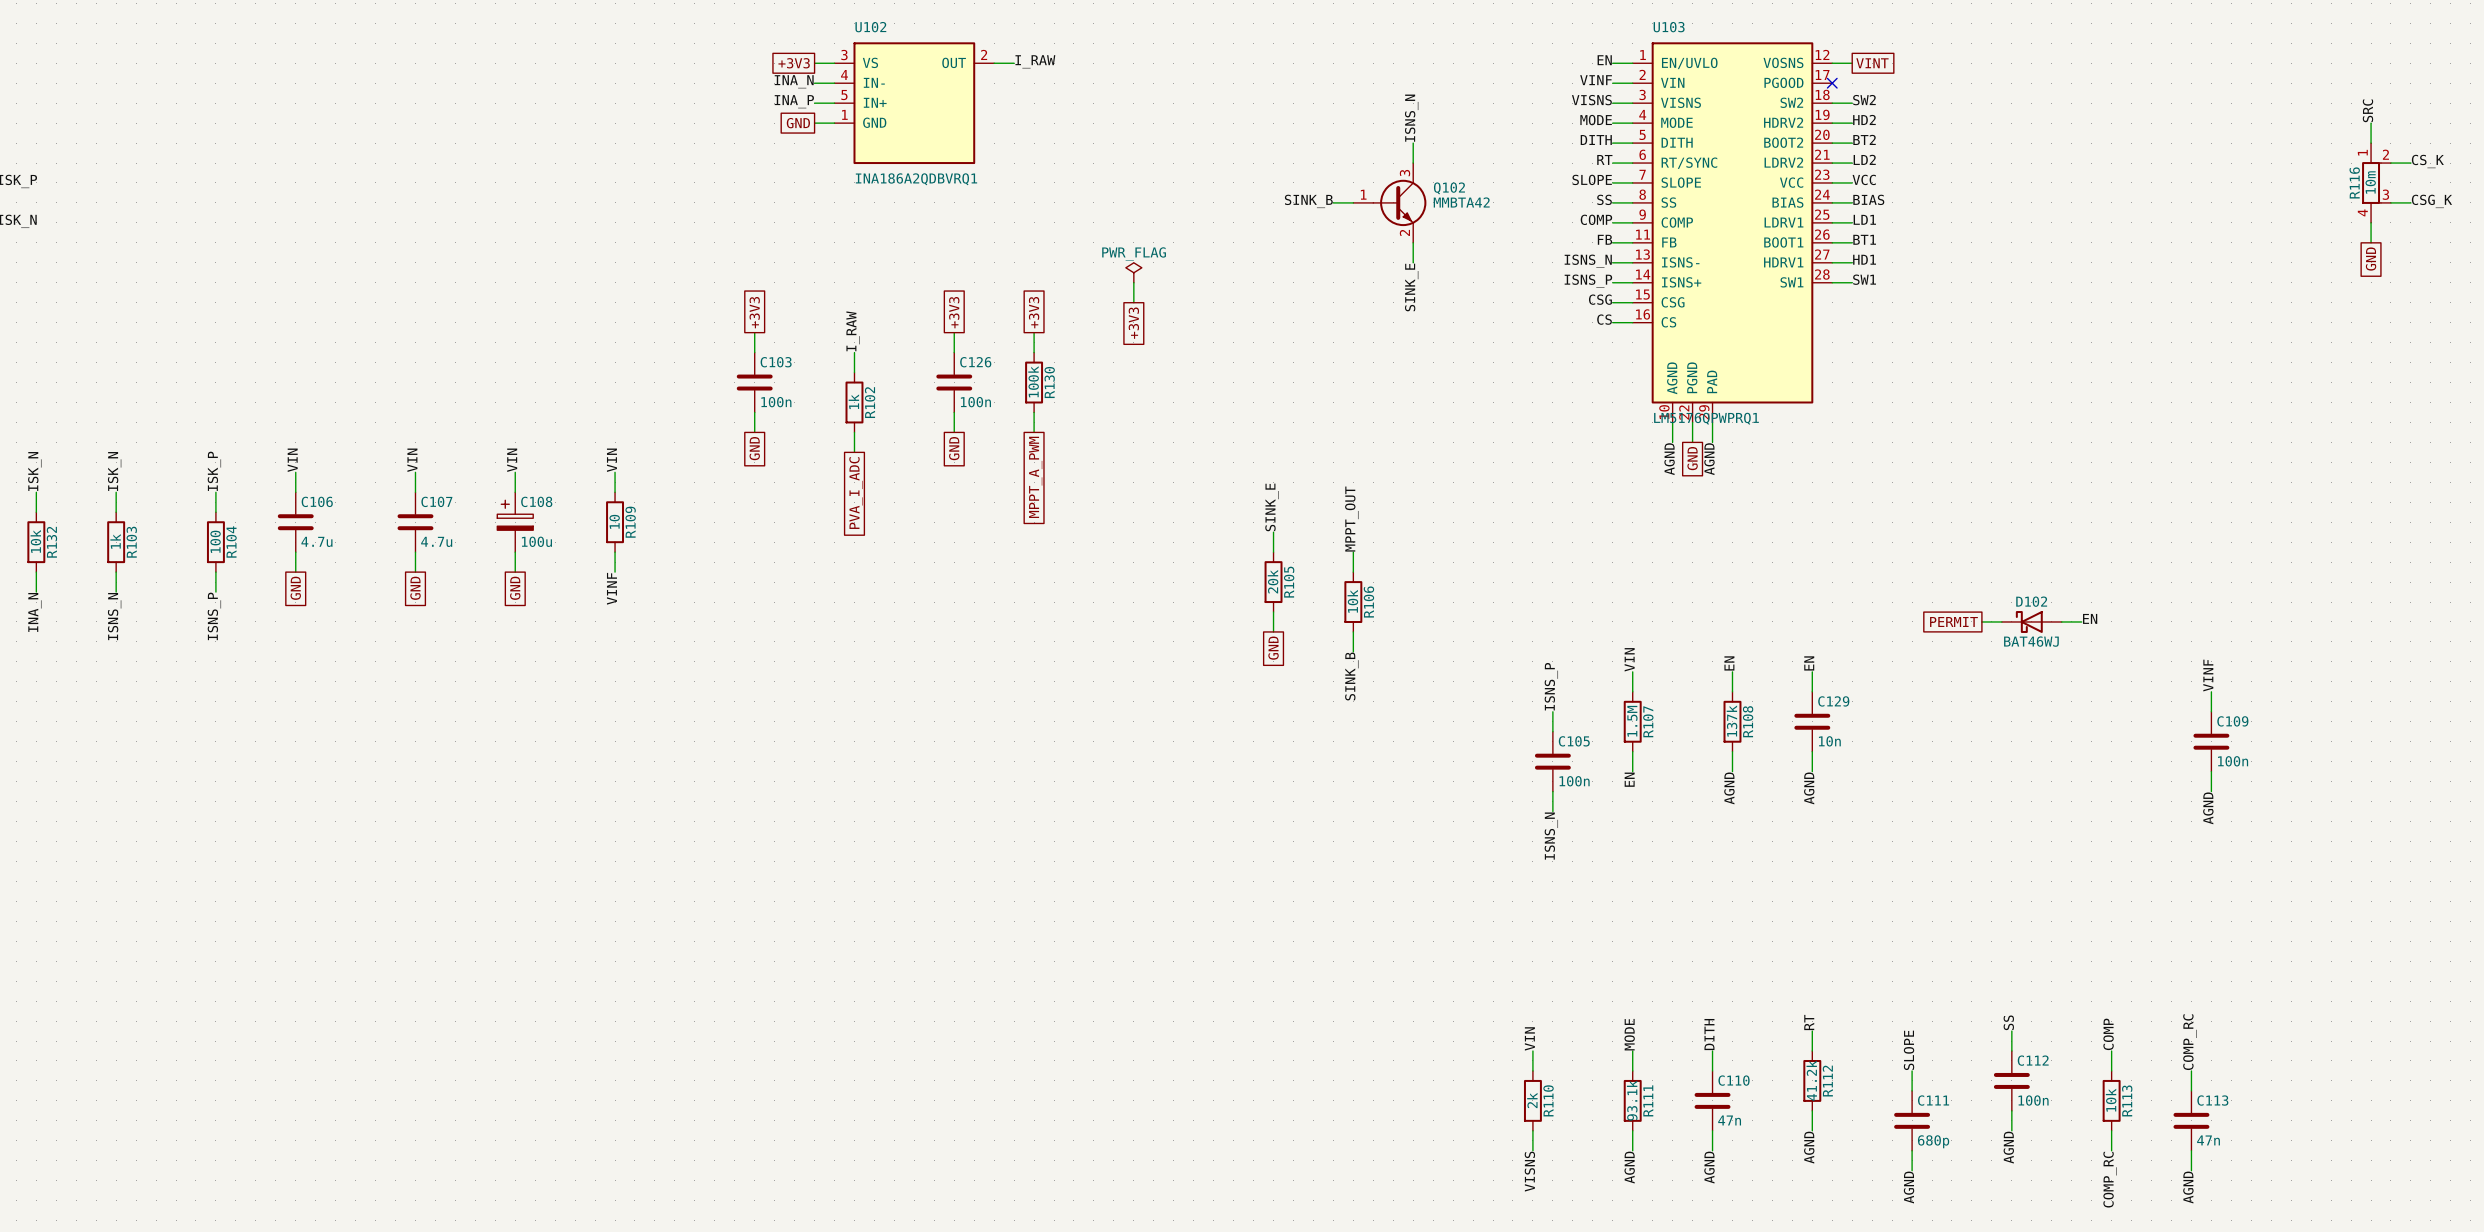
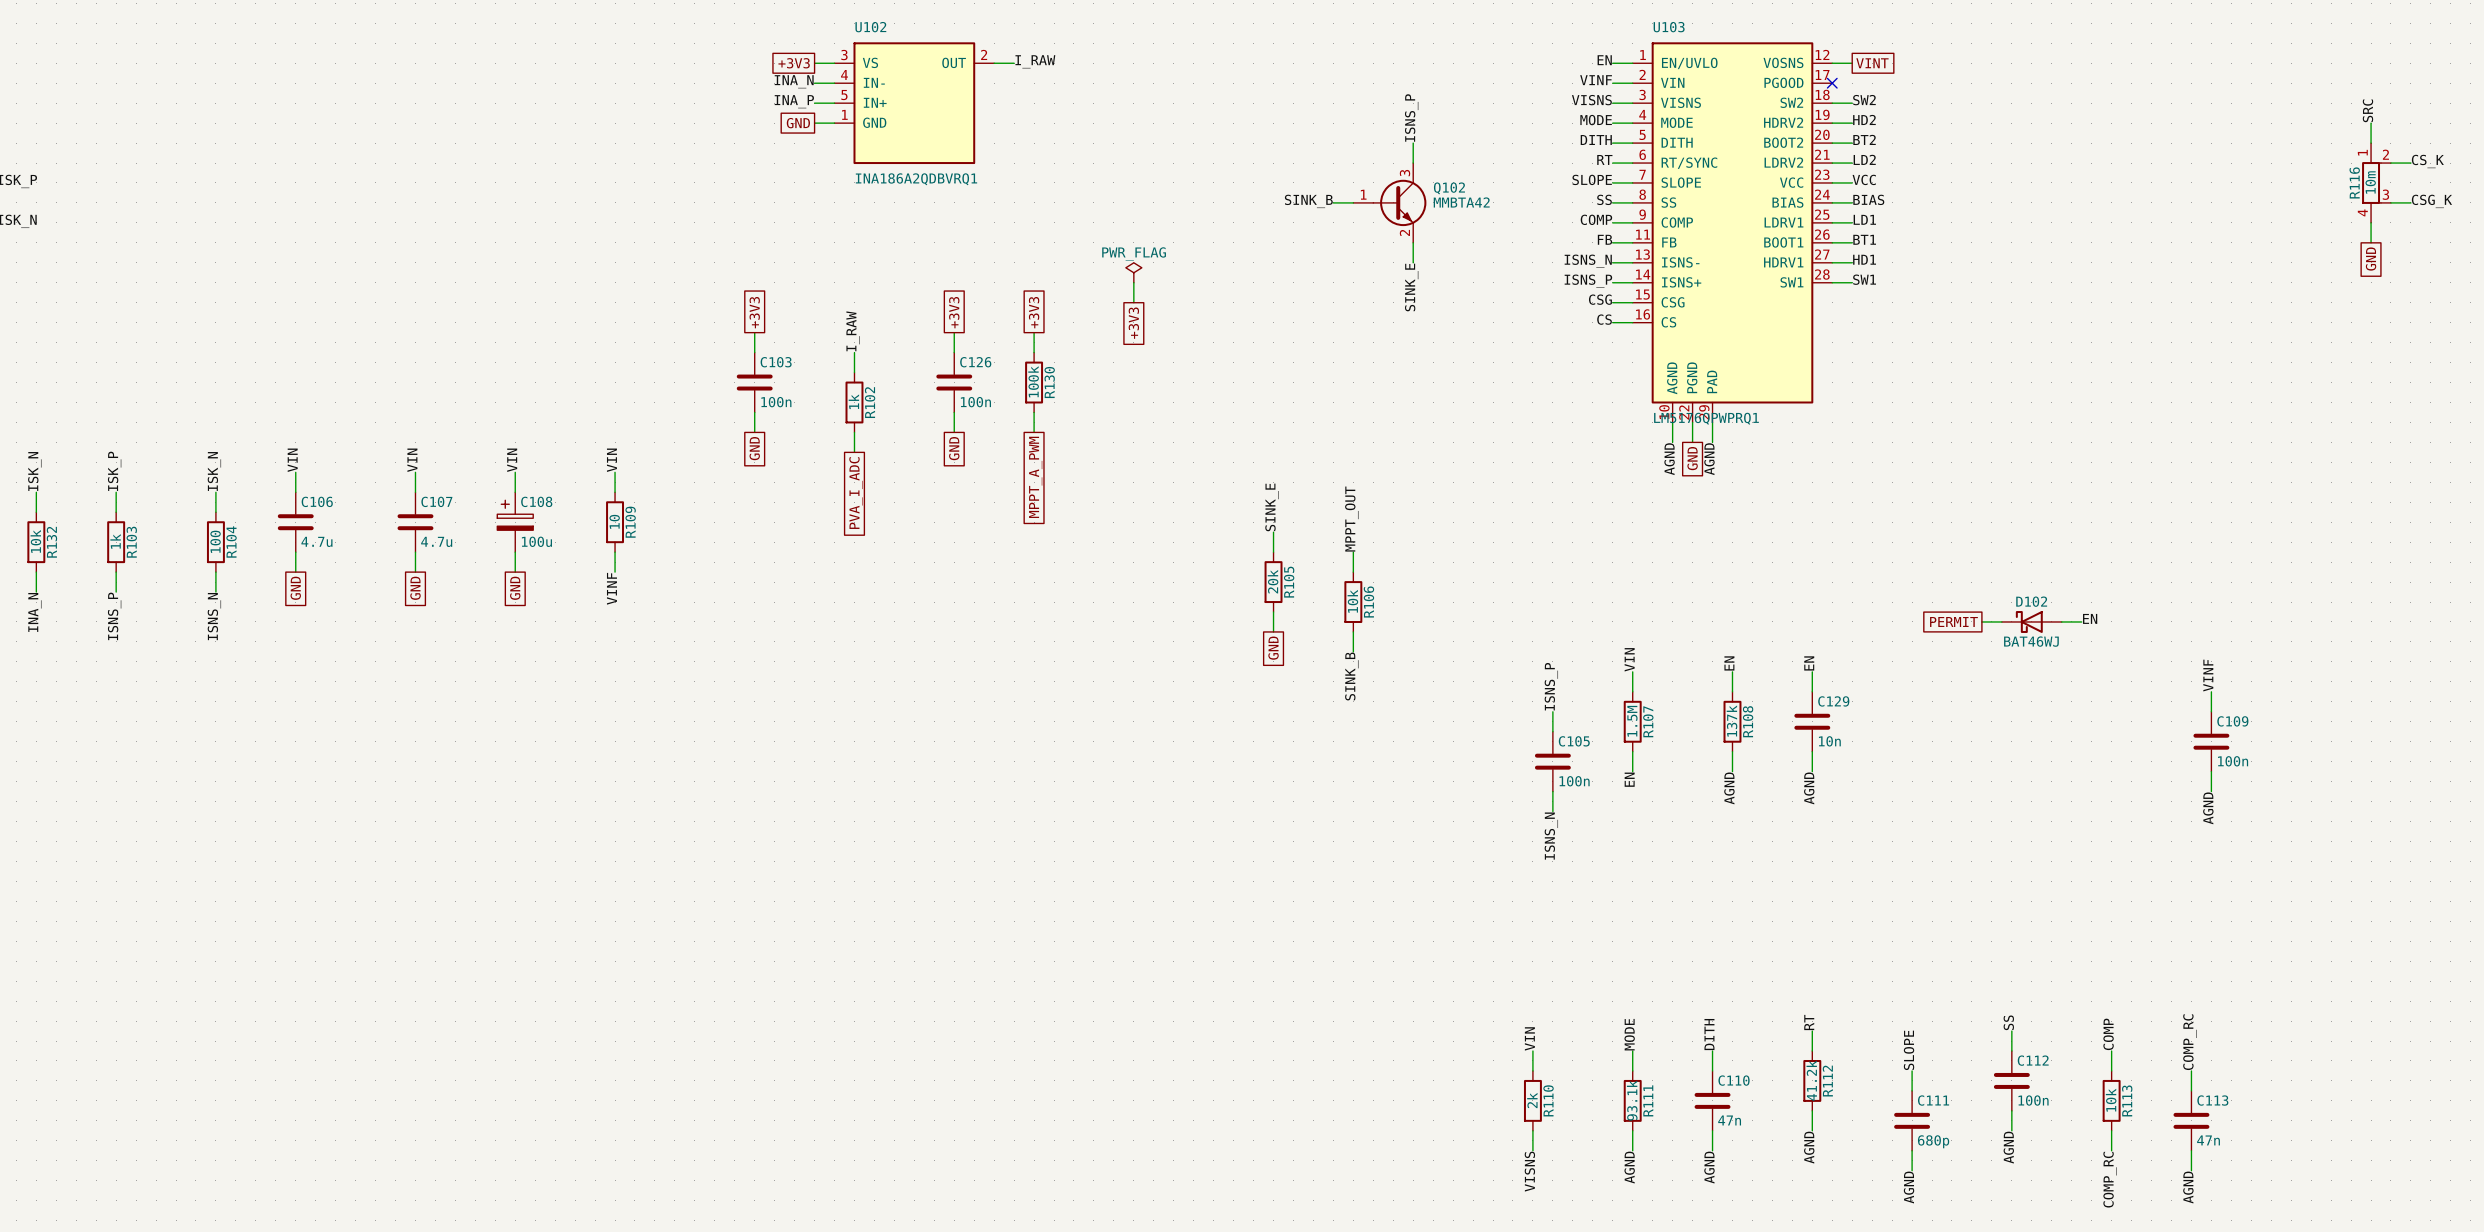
label: ISNS_N (1411, 118) -> ISNS_P (1411, 117)
label: ISK_N (114, 471) -> ISK_P (114, 471)
label: ISK_P (214, 471) -> ISK_N (214, 471)
label: ISNS_N (114, 616) -> ISNS_P (114, 616)
label: ISNS_P (214, 616) -> ISNS_N (214, 616)

